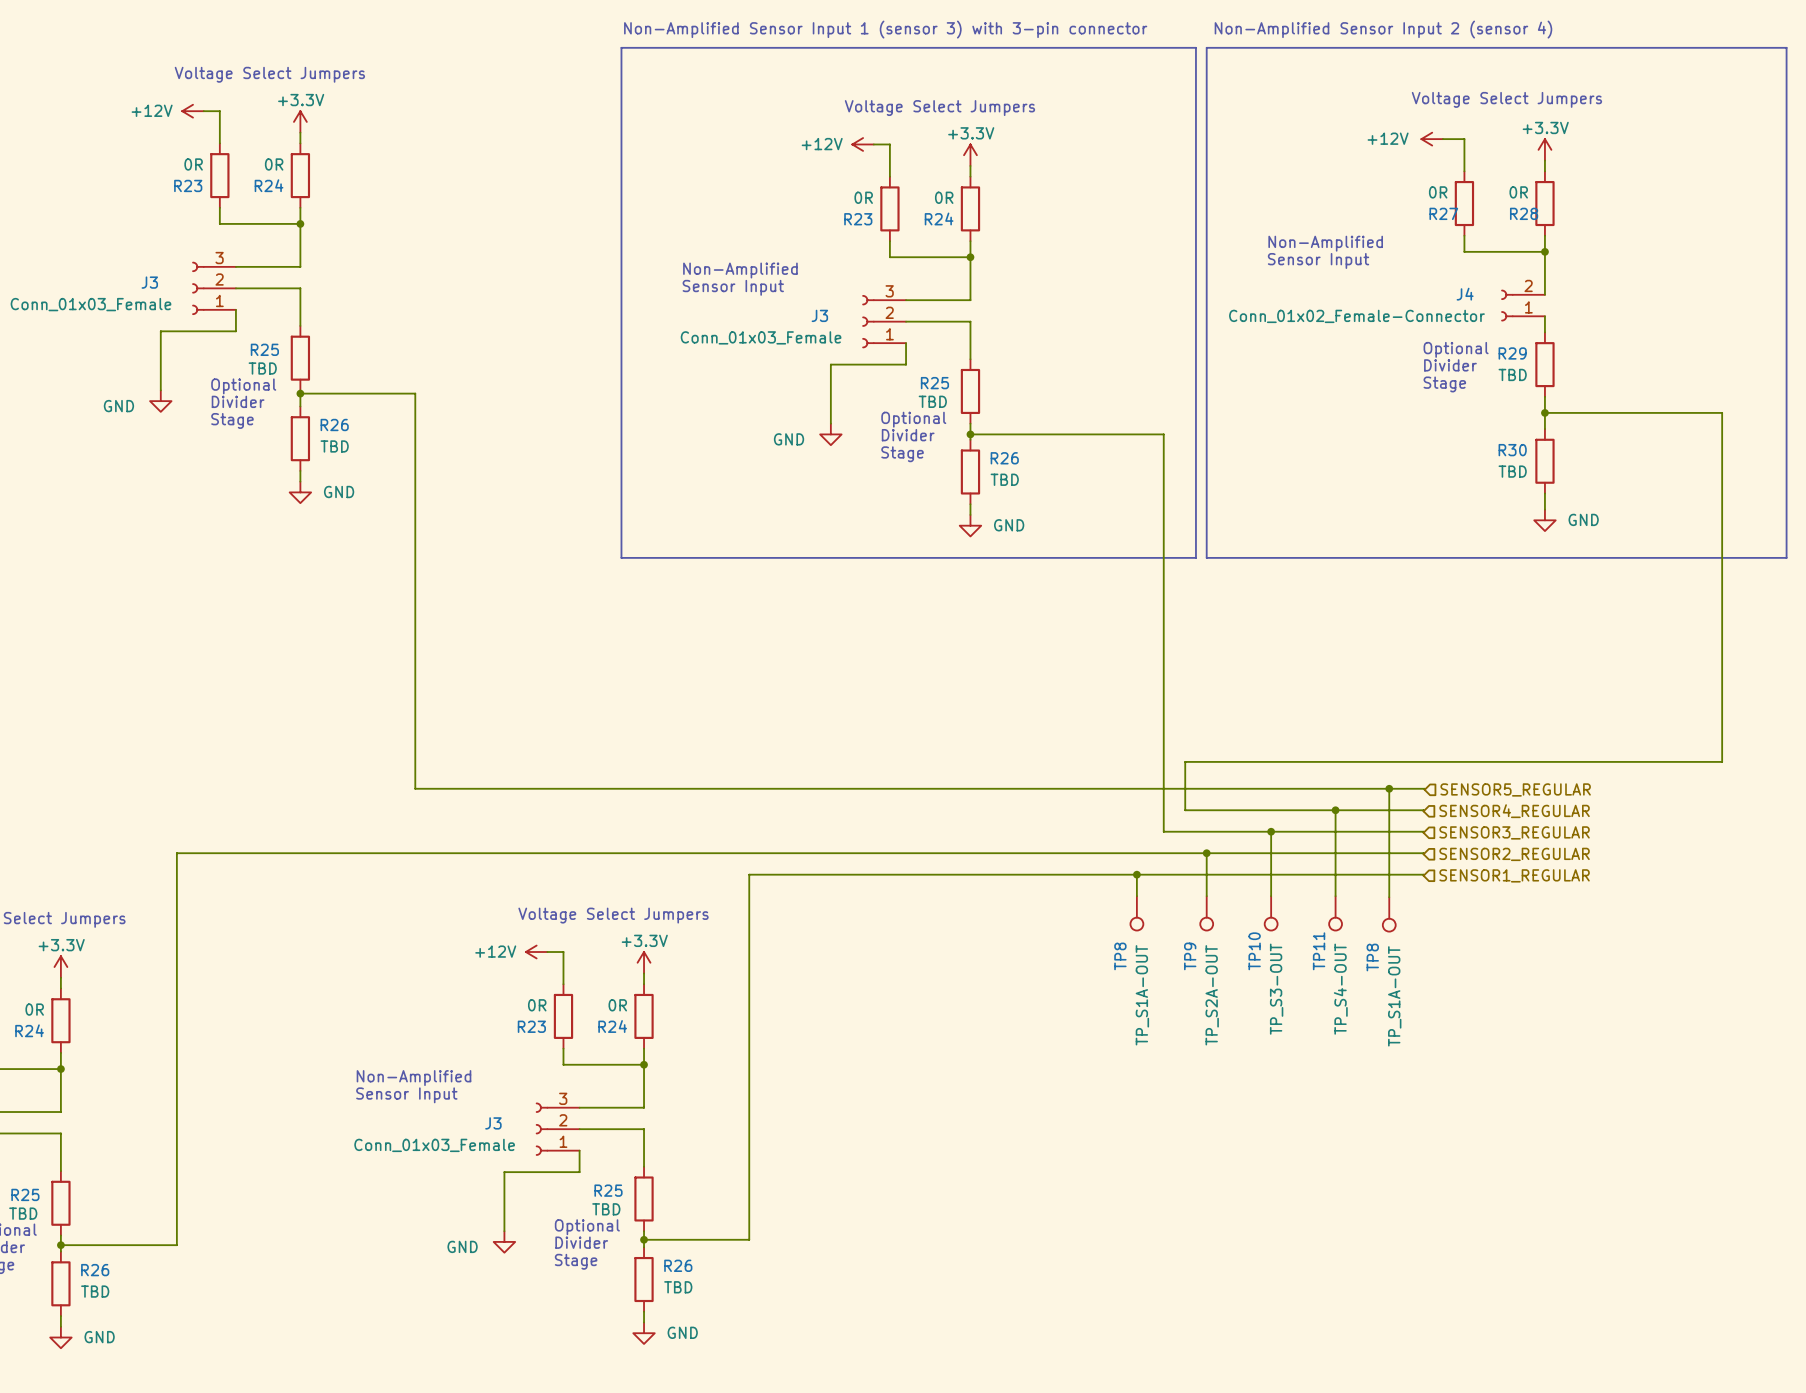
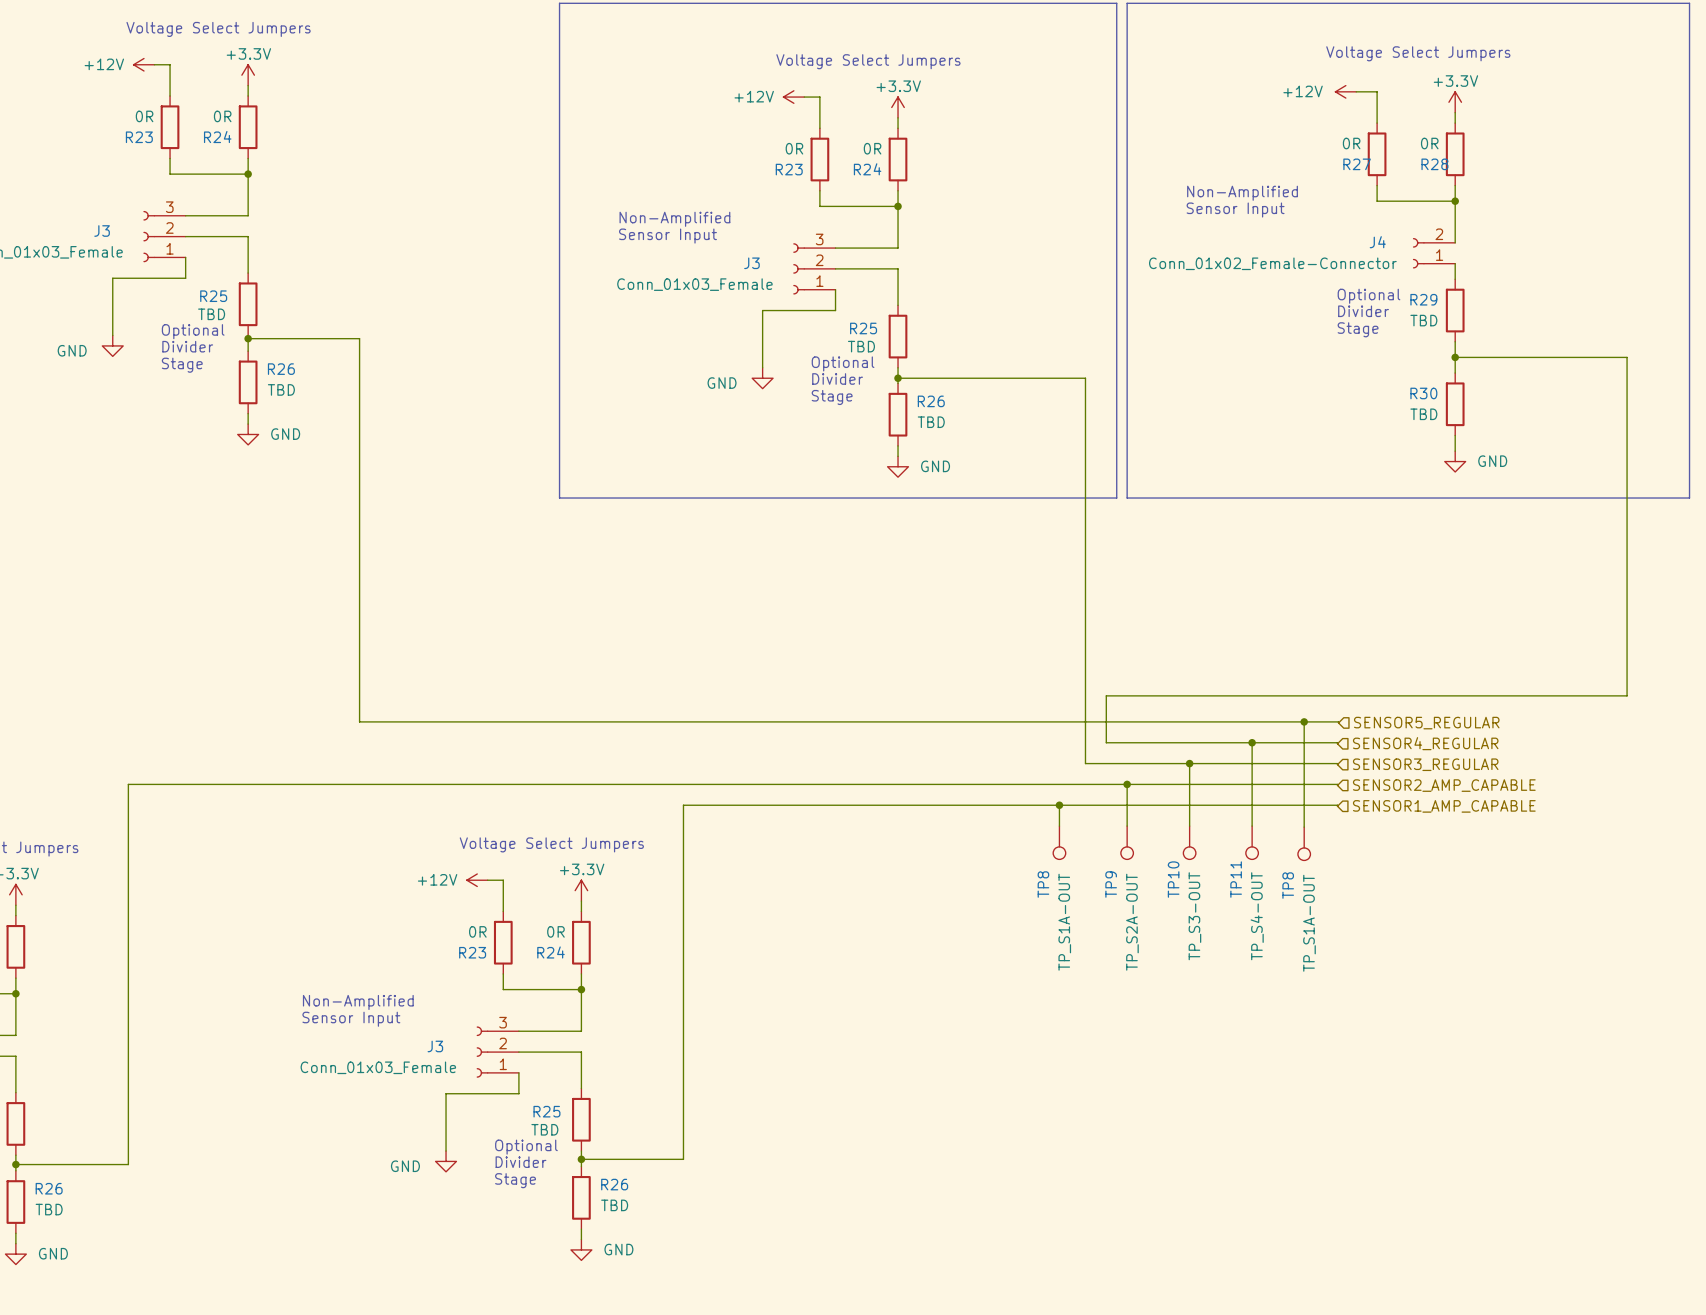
hierarchical label: SENSOR2_REGULAR (1514, 854) -> SENSOR2_AMP_CAPABLE (1444, 785)
hierarchical label: SENSOR1_REGULAR (1514, 875) -> SENSOR1_AMP_CAPABLE (1444, 806)

